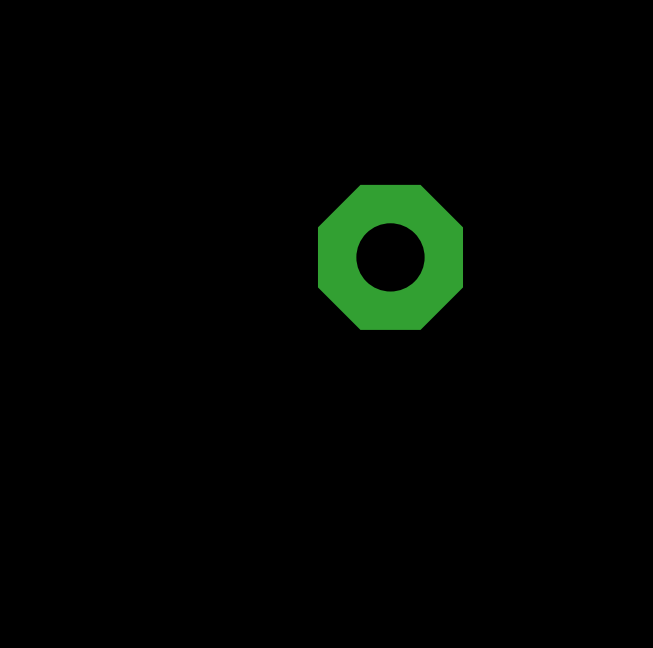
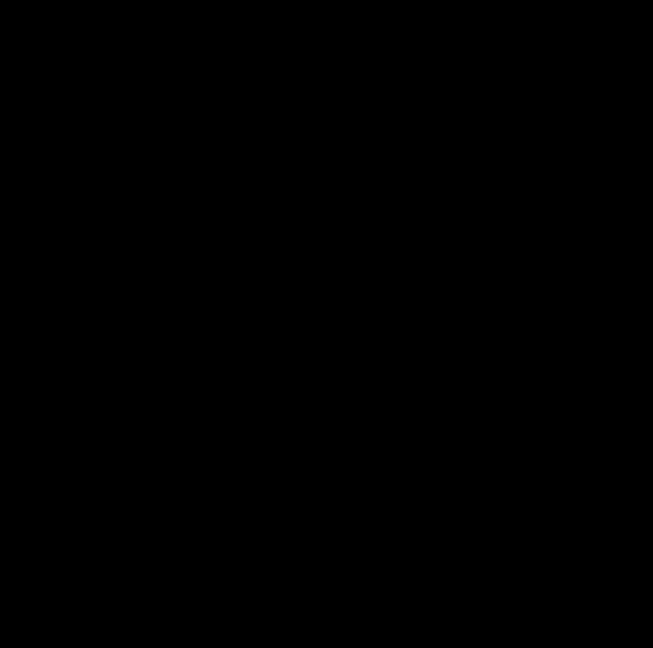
part: (390, 257) -> none

